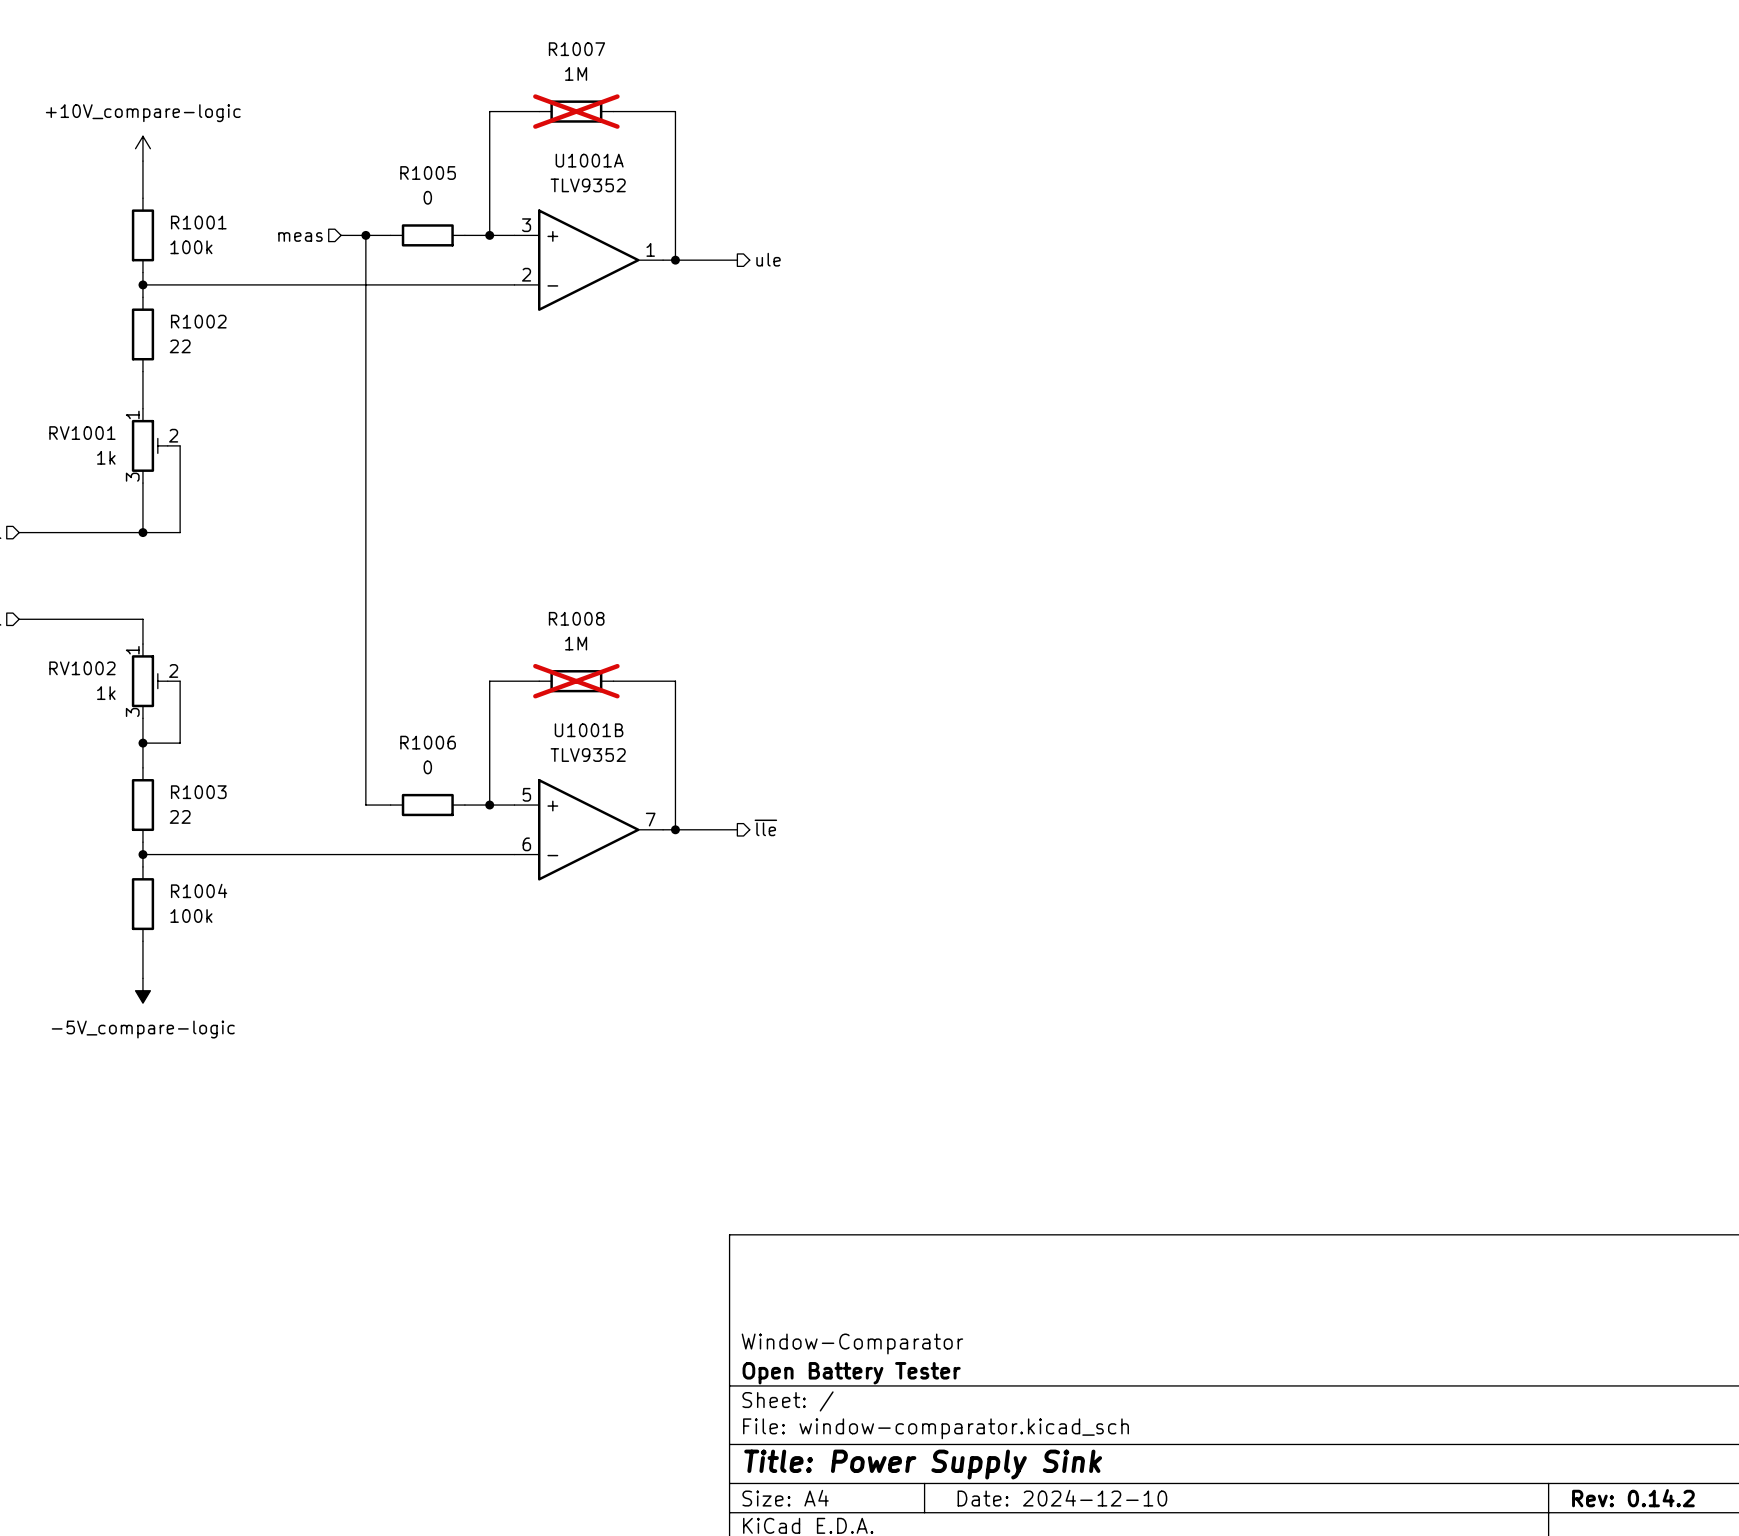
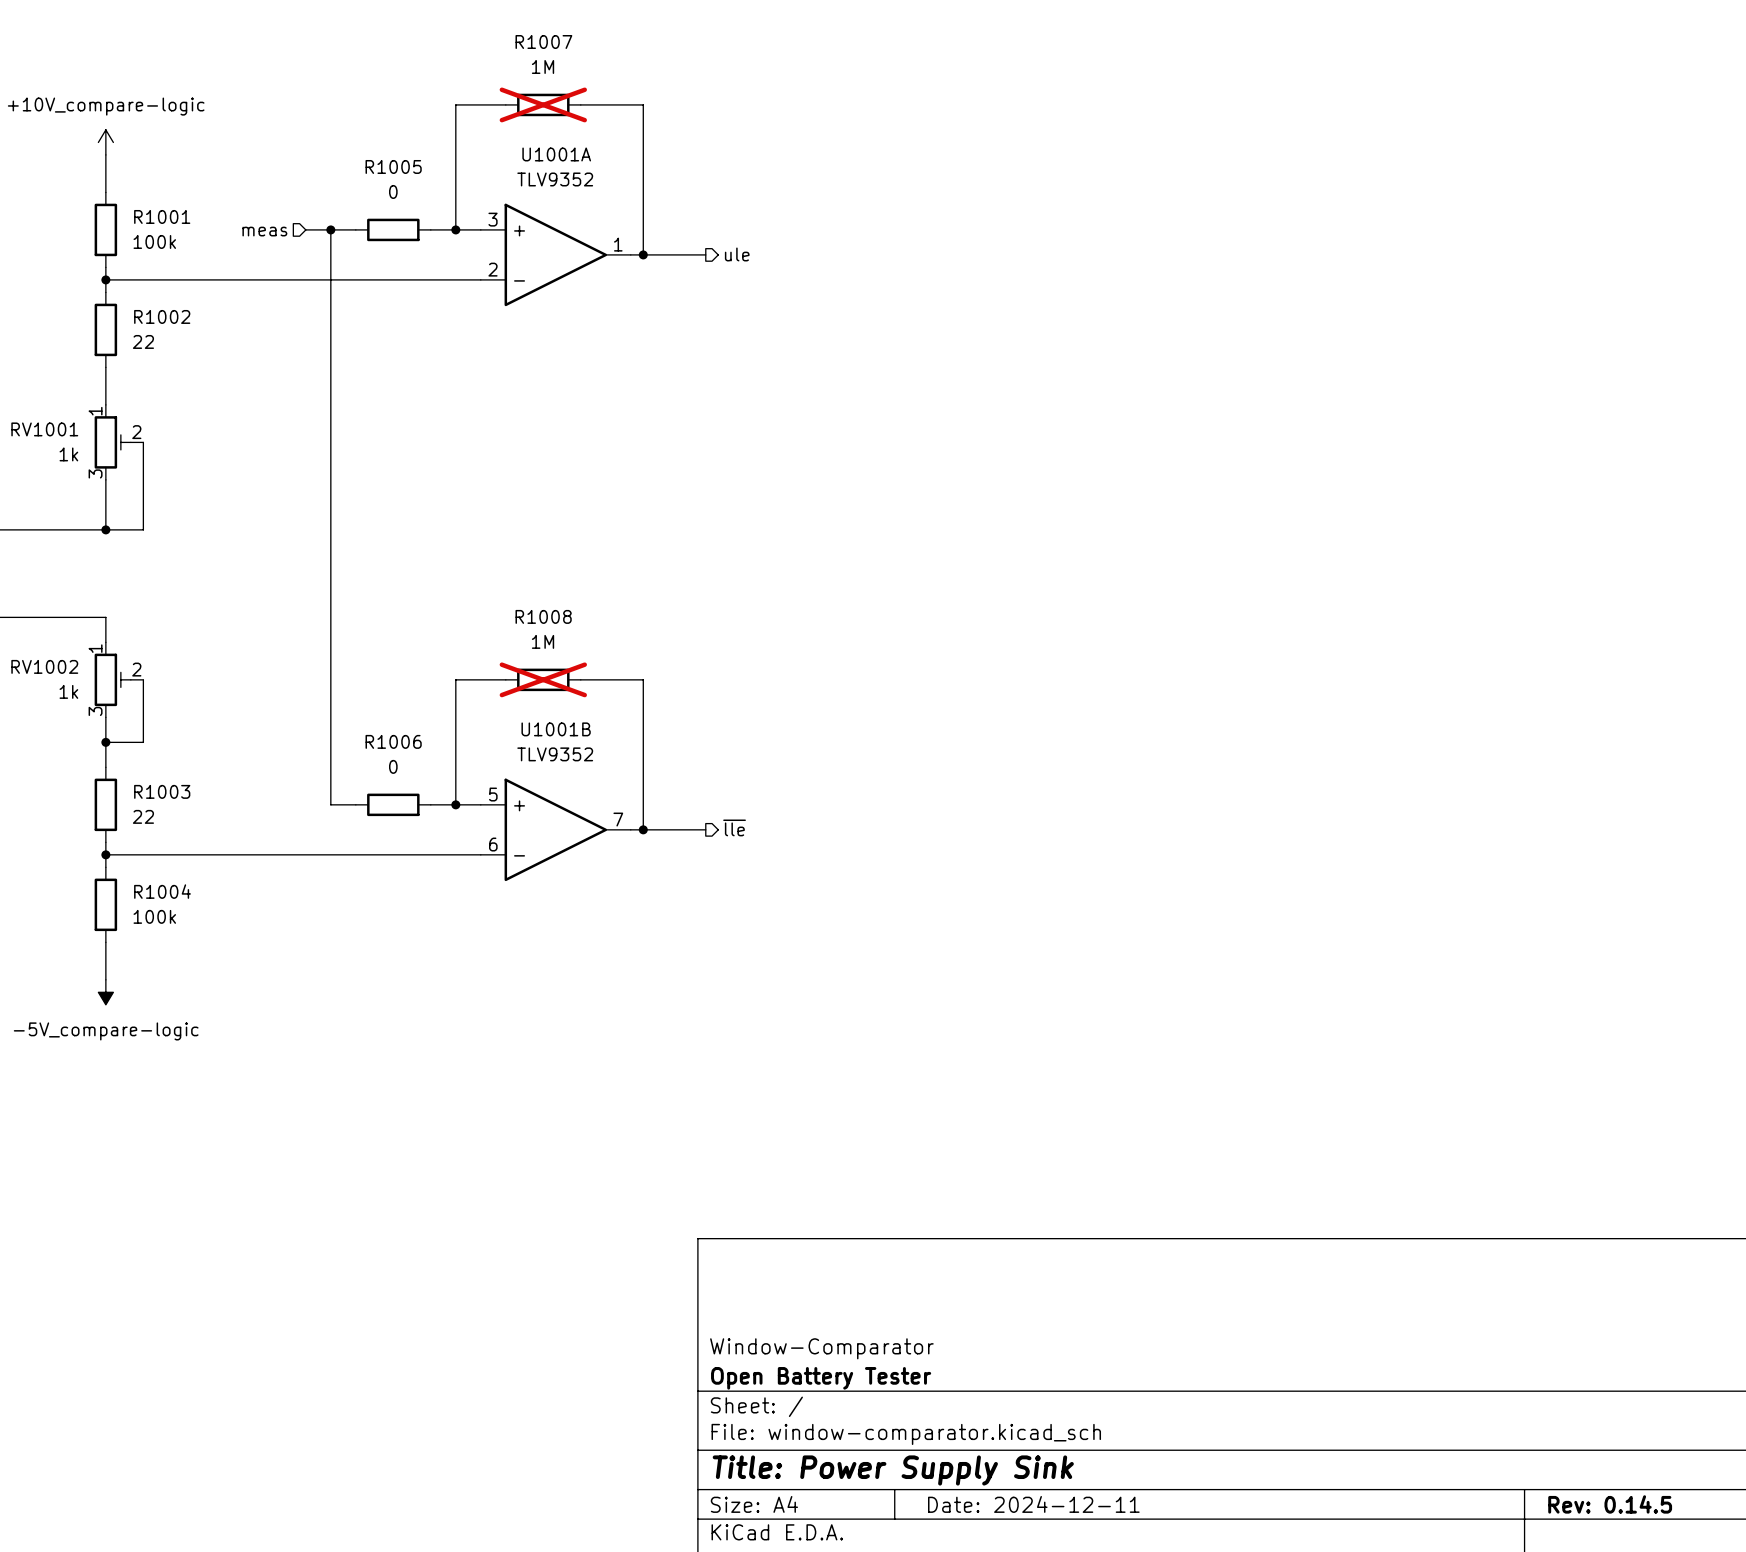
title block: Date: 2024-12-10 (1062, 1498) -> Date: 2024-12-11 (1033, 1504)
title block: Rev: 0.14.2 (1633, 1498) -> Rev: 0.14.5 (1610, 1504)

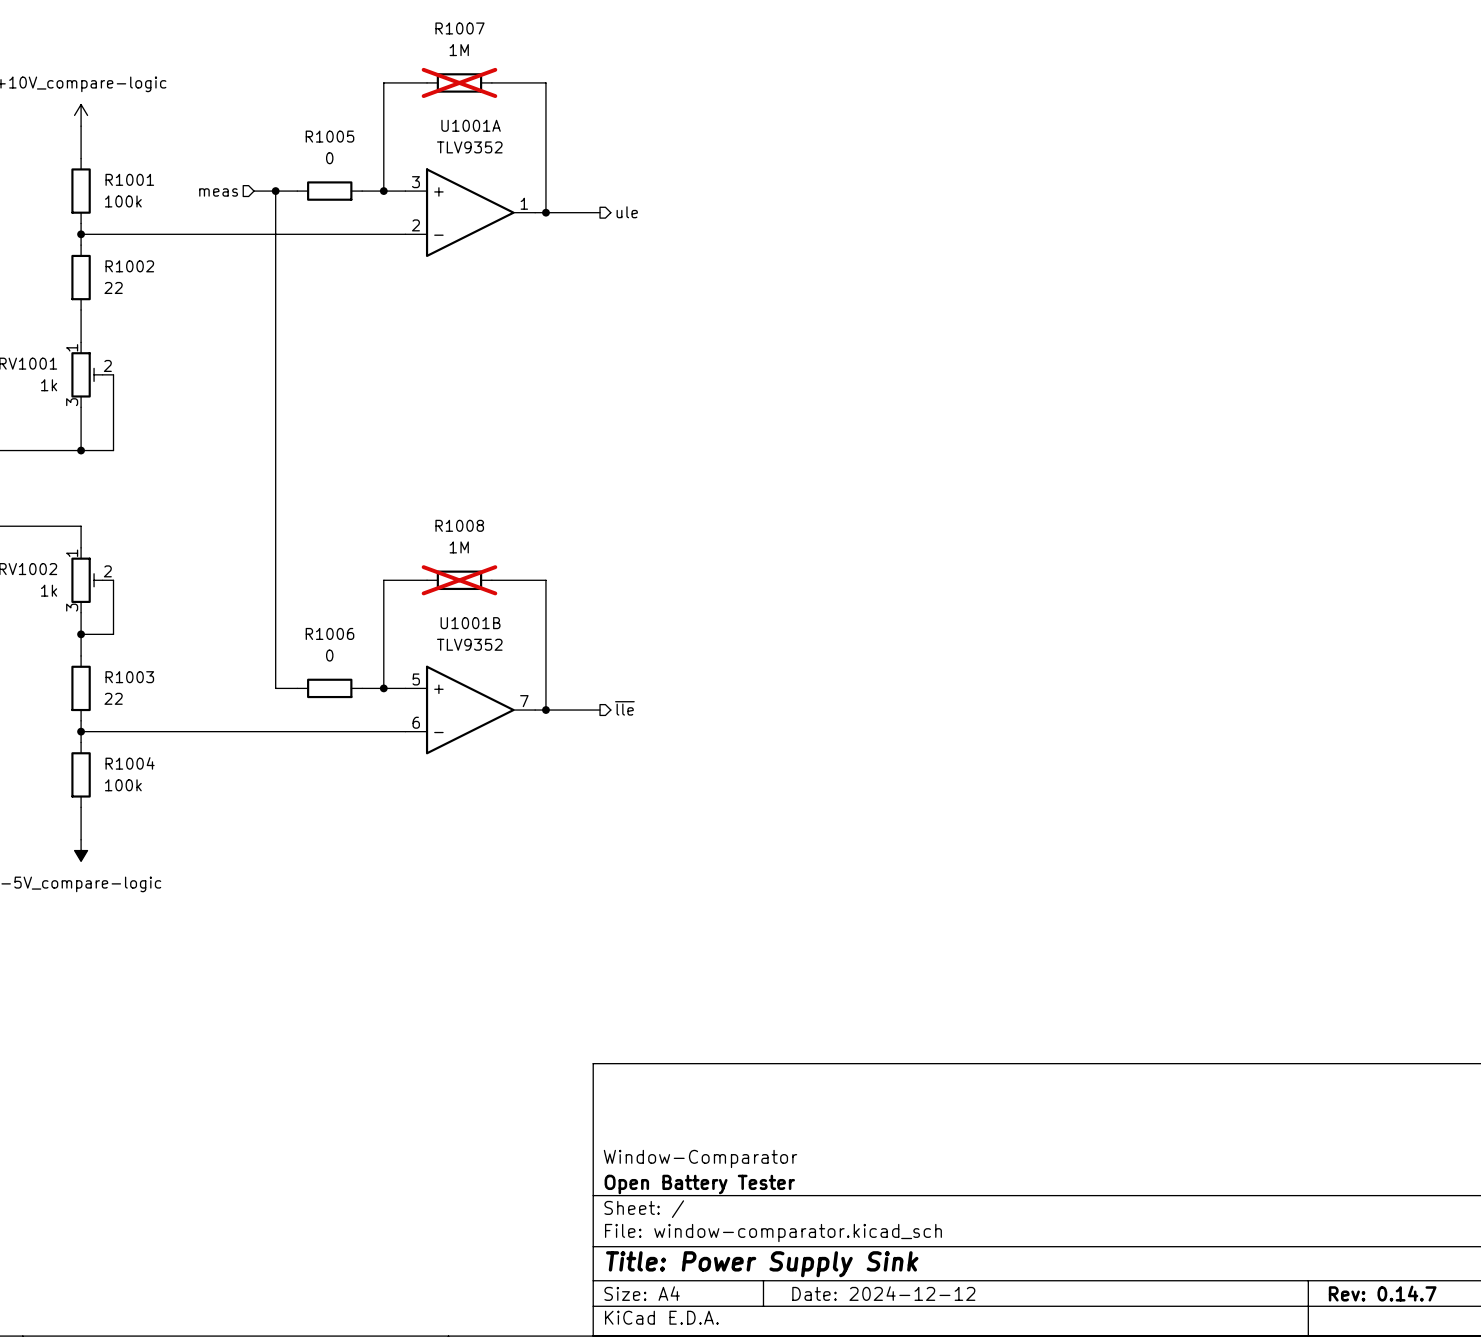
title block: Date: 2024-12-11 (1033, 1504) -> Date: 2024-12-12 (883, 1293)
title block: Rev: 0.14.5 (1610, 1504) -> Rev: 0.14.7 (1382, 1293)

